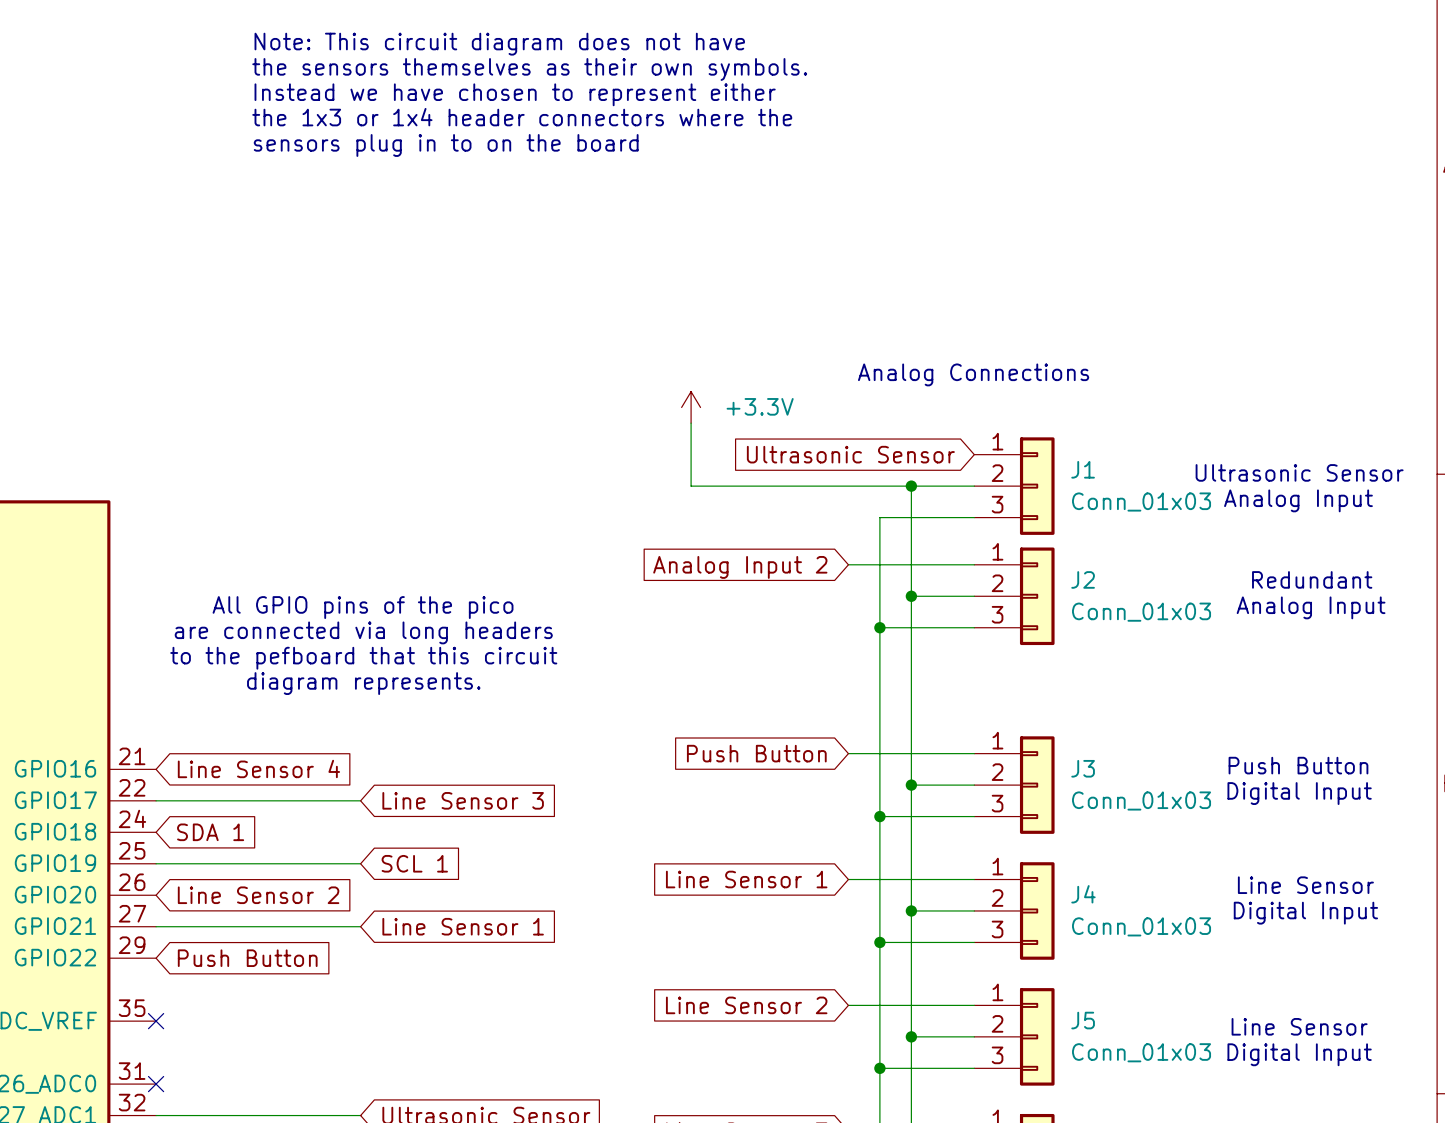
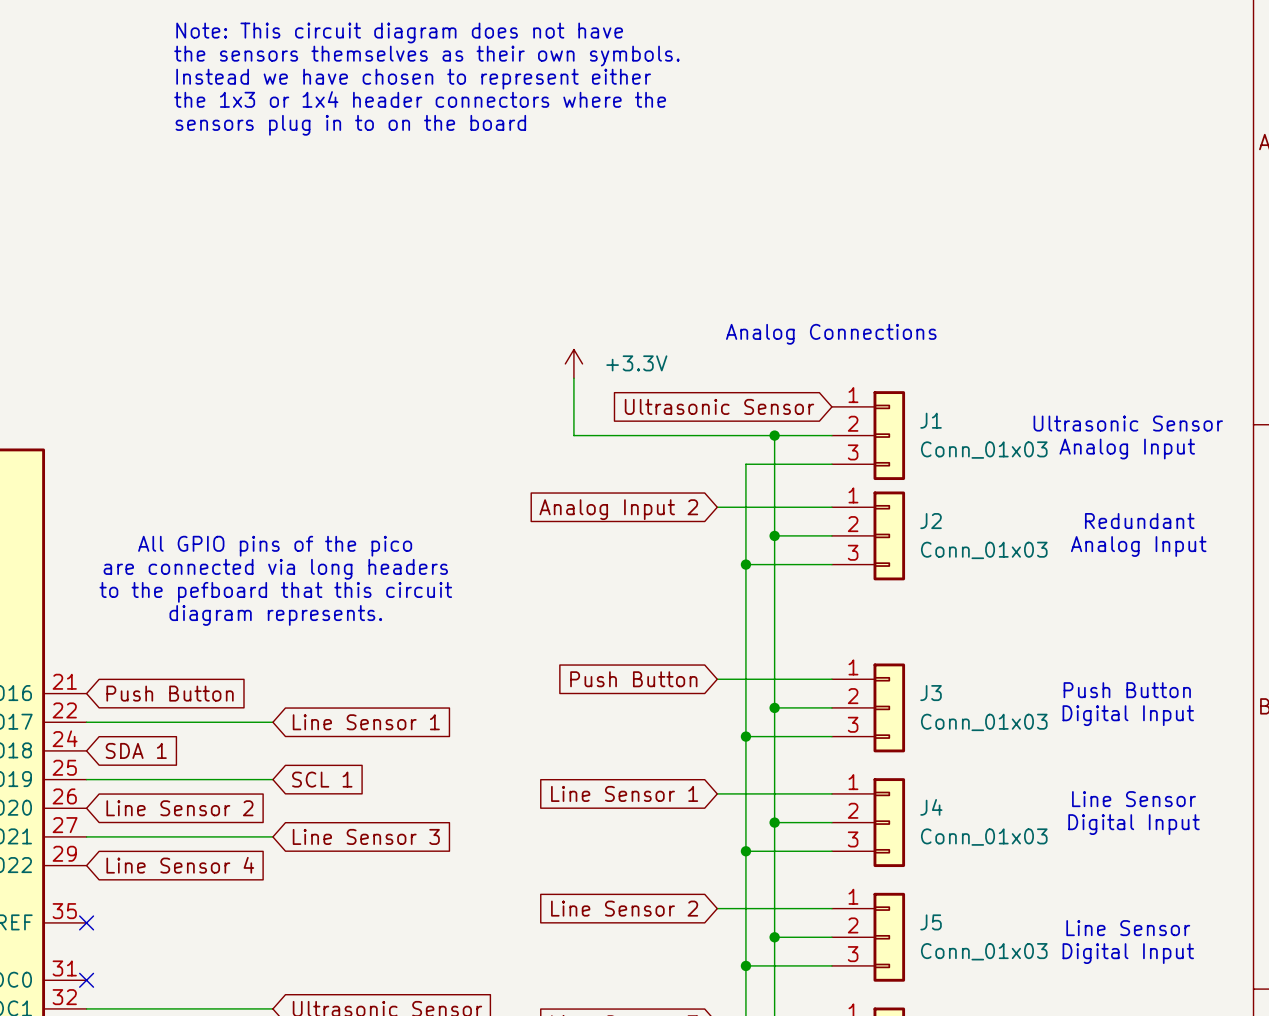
global label: Line Sensor 4 (258, 768) -> Push Button (170, 693)
global label: Line Sensor 3 (463, 800) -> Line Sensor 1 (366, 722)
global label: Line Sensor 1 (463, 926) -> Line Sensor 3 (366, 836)
global label: Push Button (247, 958) -> Line Sensor 4 (180, 865)

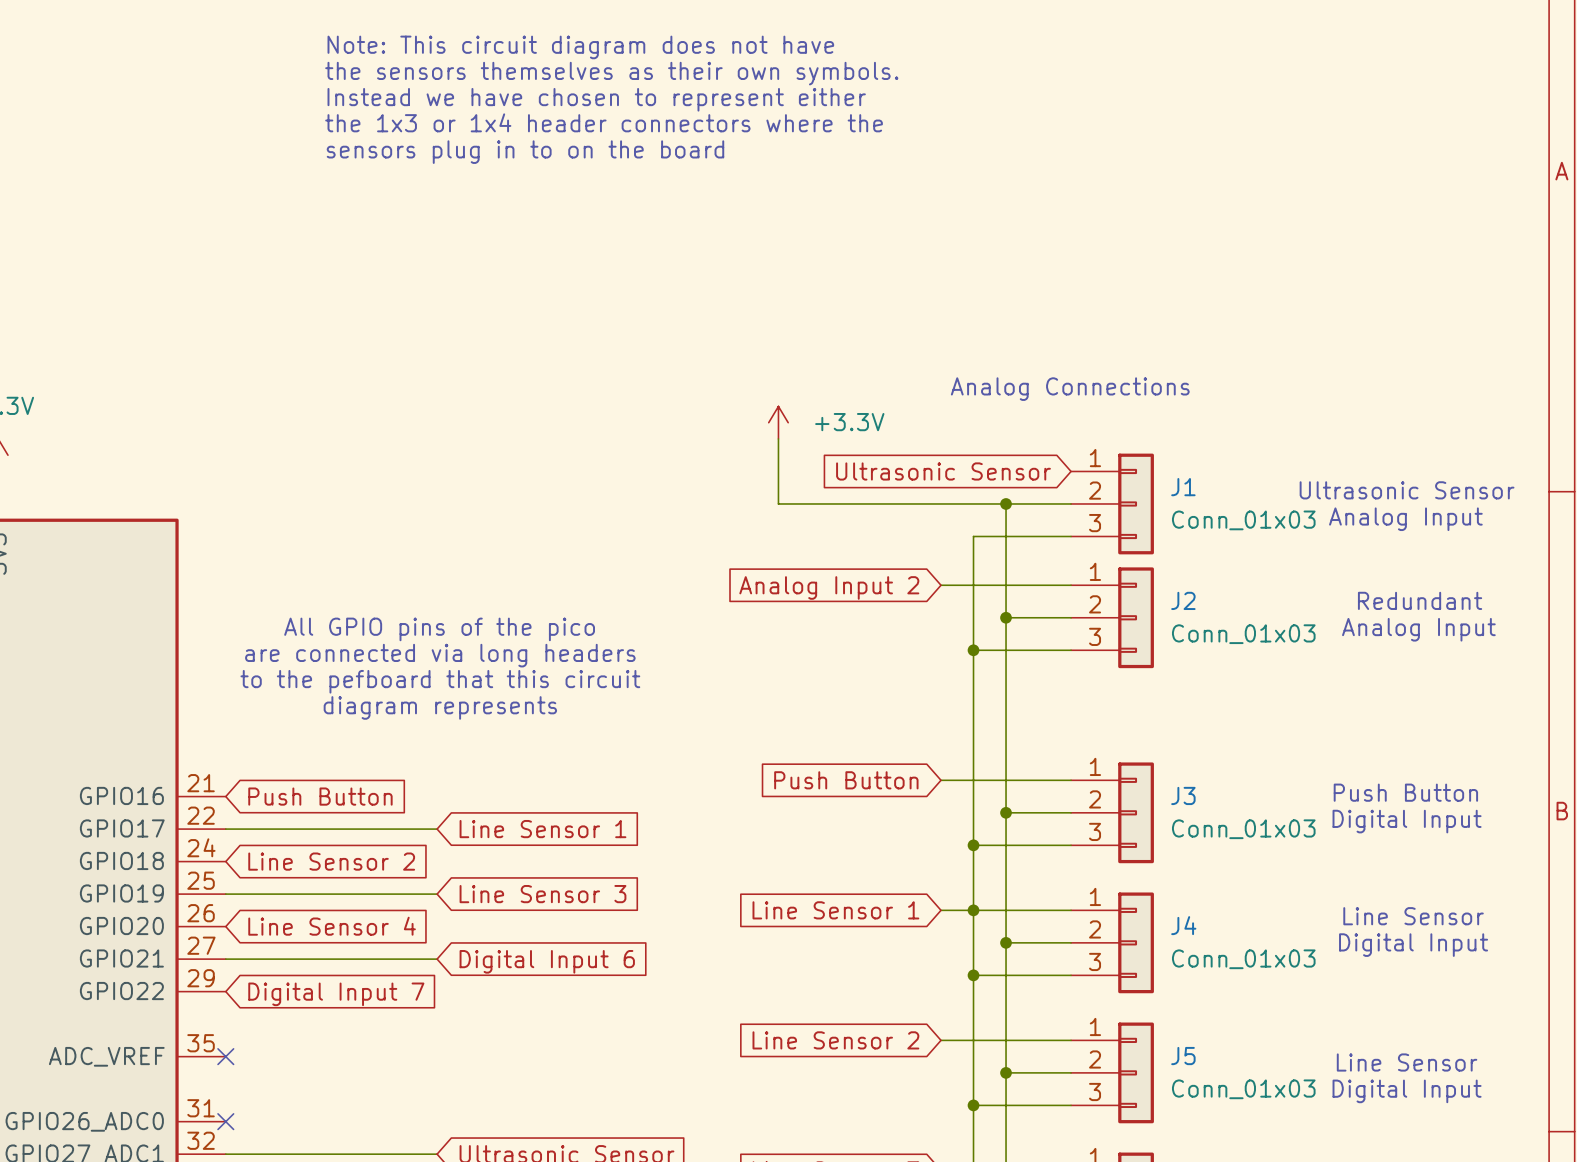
text: diagram represents. (275, 615) -> diagram represents (440, 707)
global label: SDA 1 (136, 750) -> Line Sensor 2 (331, 861)
global label: SCL 1 (322, 779) -> Line Sensor 3 (542, 894)
junction: none -> (973, 910)
global label: Line Sensor 2 (179, 808) -> Line Sensor 4 (332, 926)
global label: Line Sensor 3 (366, 836) -> Digital Input 6 (547, 961)
global label: Line Sensor 4 (180, 865) -> Digital Input 7 (336, 994)

